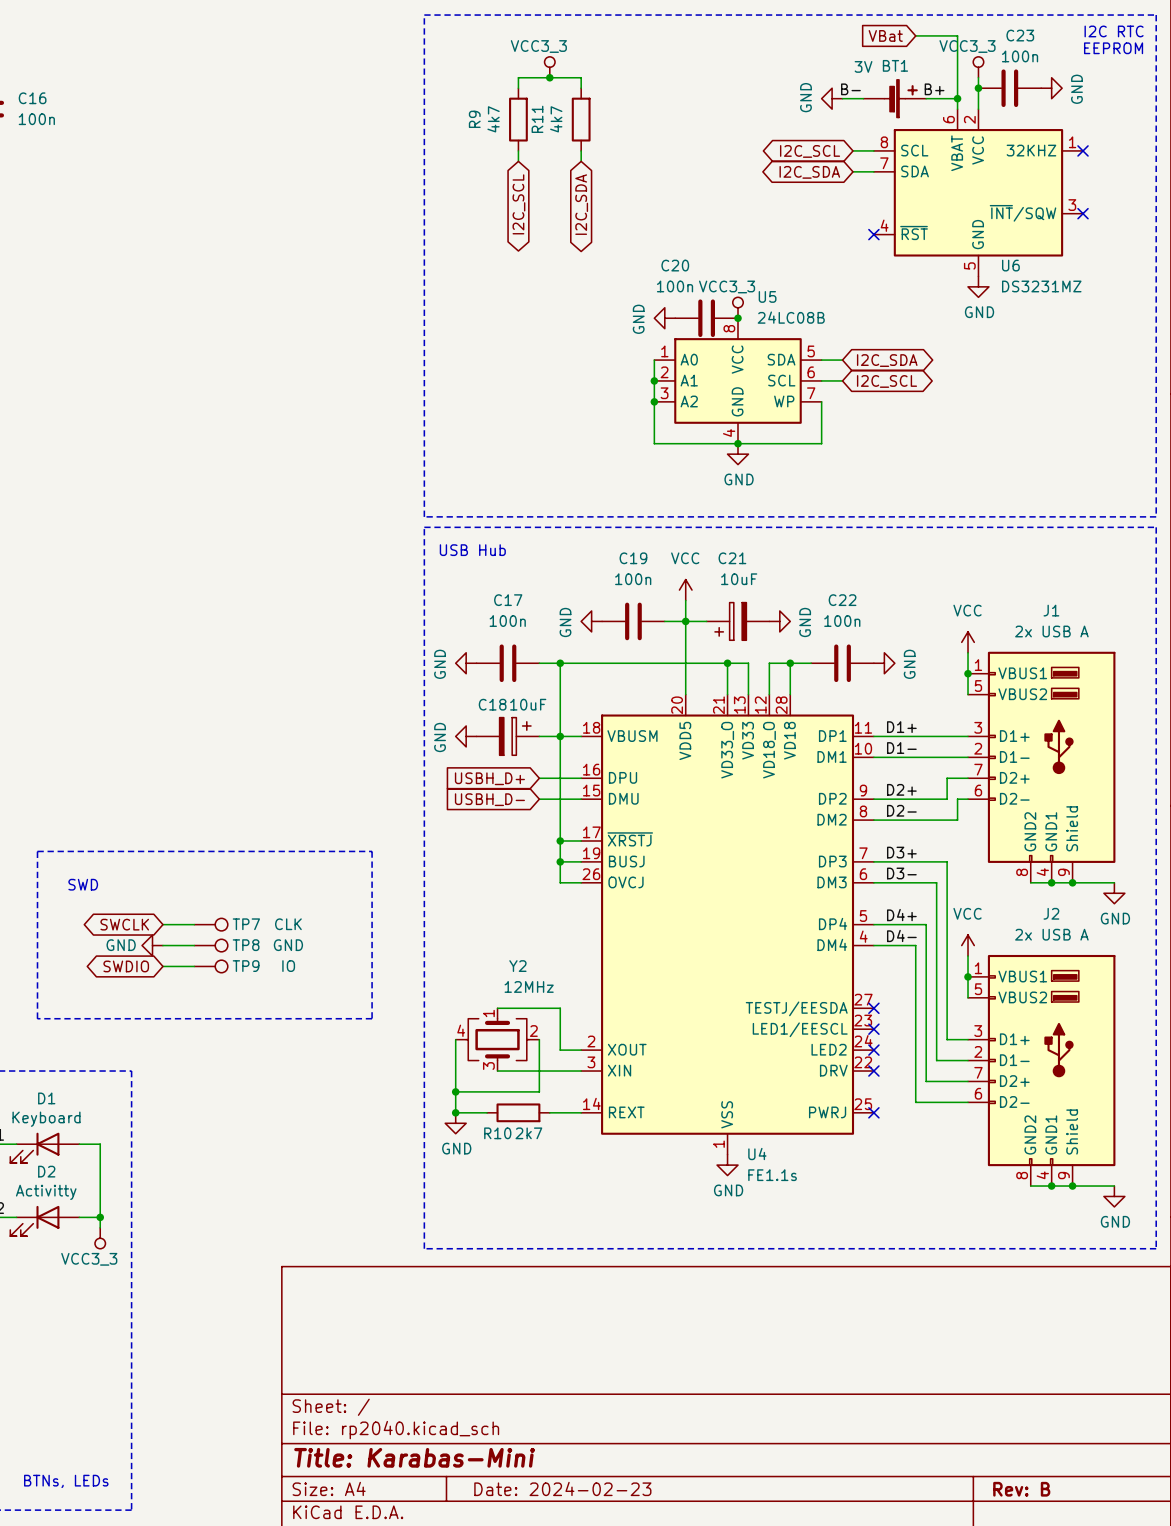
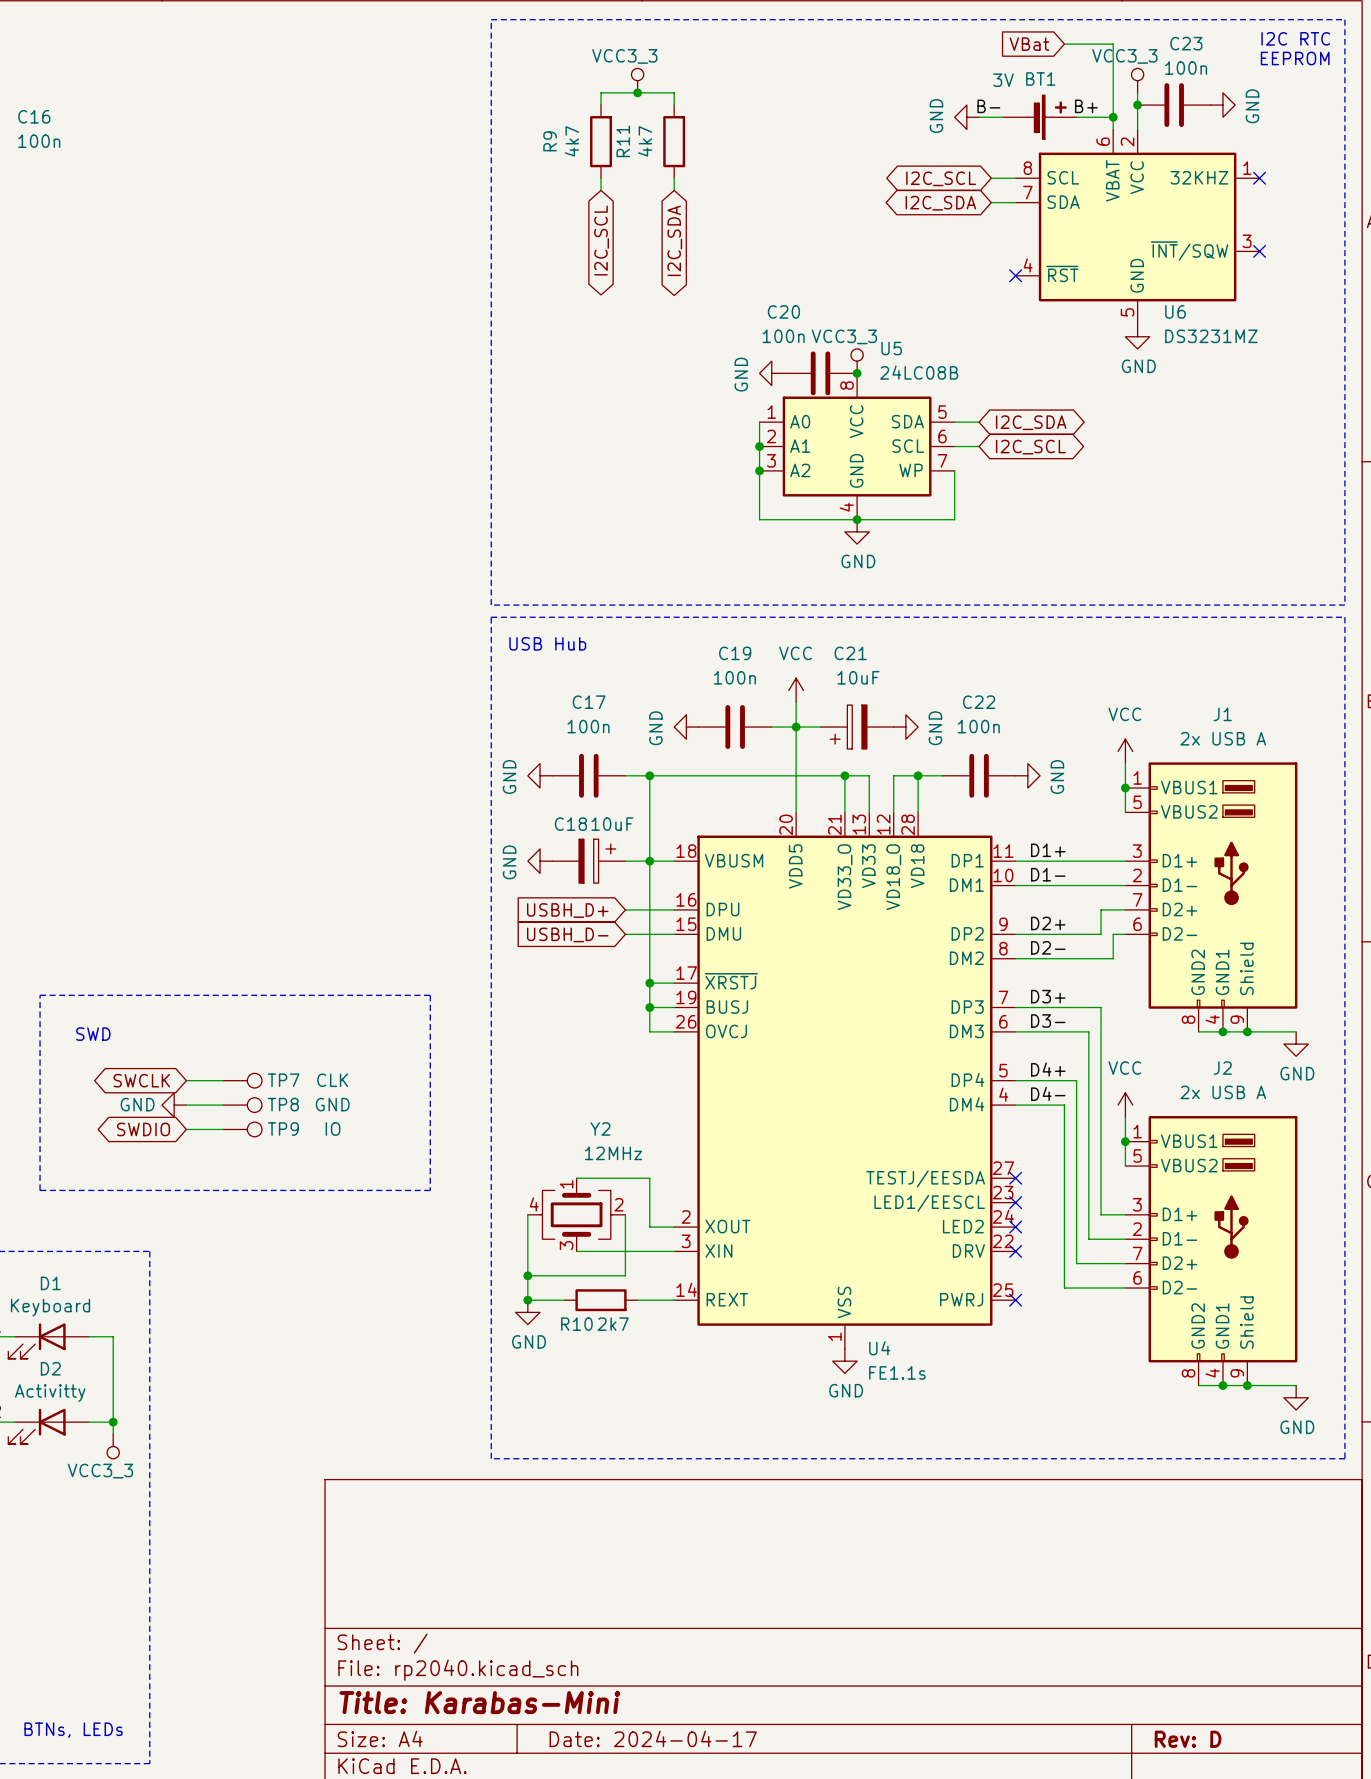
title block: Date: 2024-02-23 (562, 1488) -> Date: 2024-04-17 (653, 1738)
title block: Rev: B (1021, 1489) -> Rev: D (1188, 1739)

